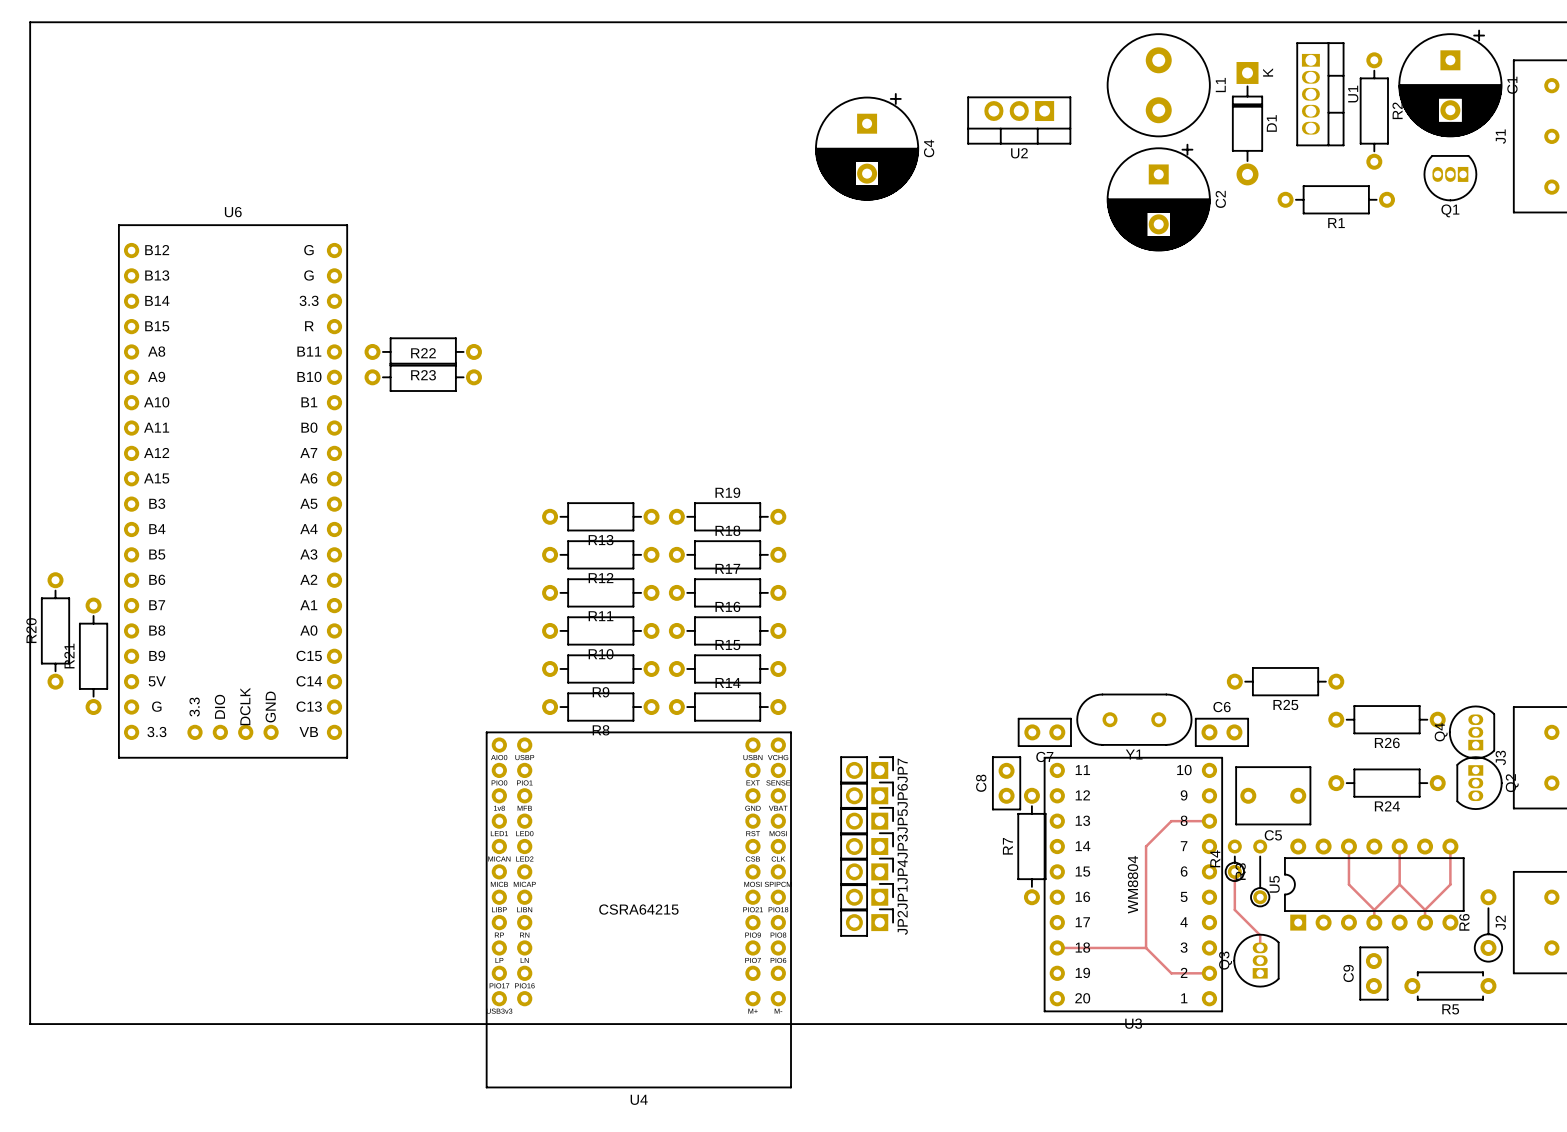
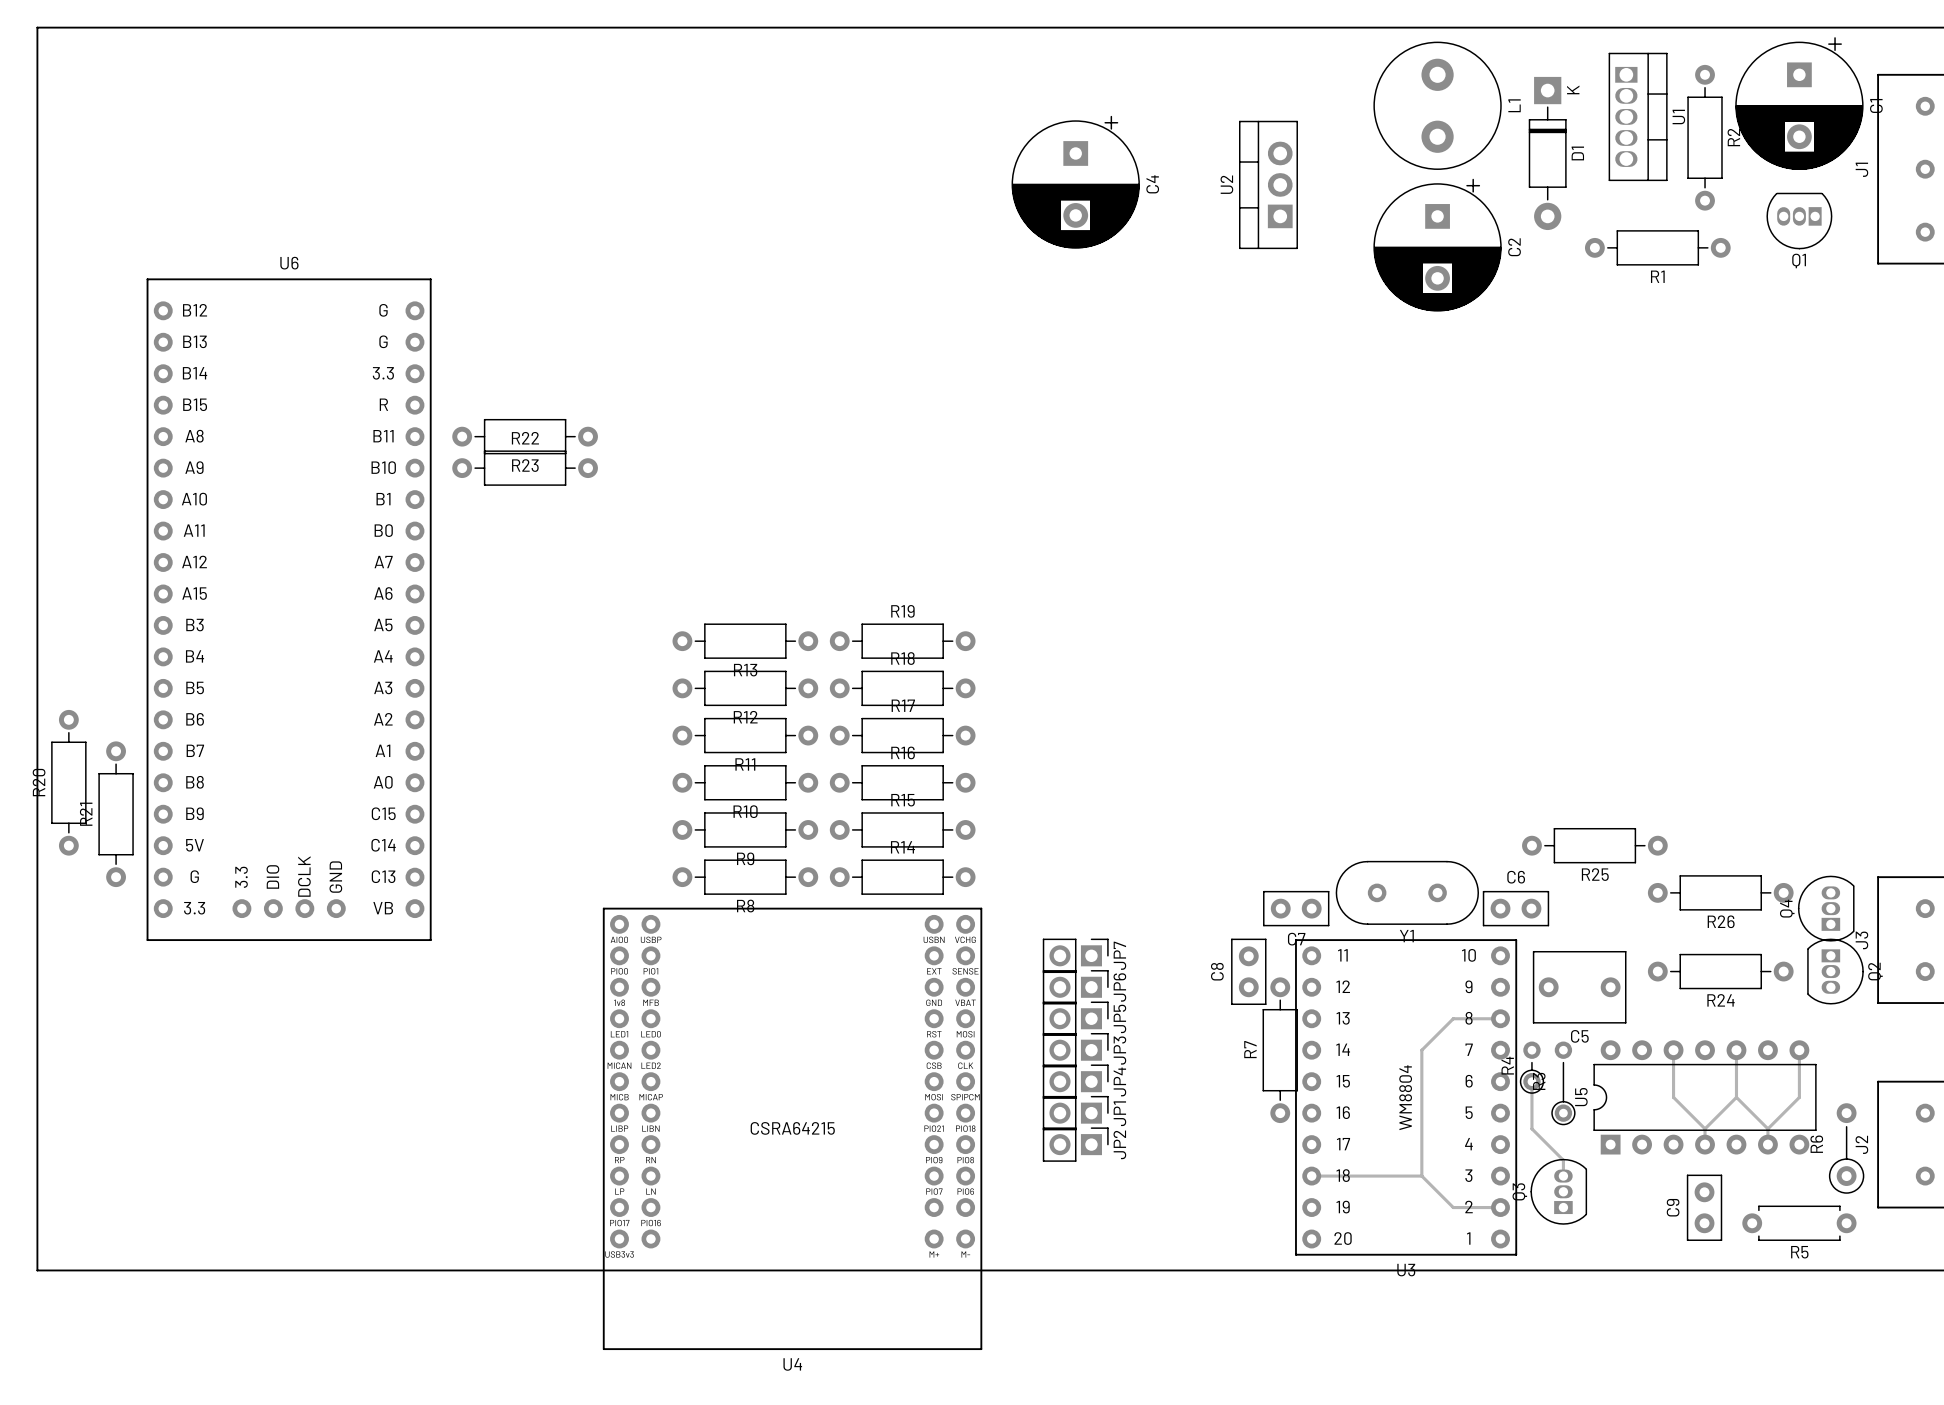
U2 rotation: 0° (1019, 120) -> 90° clockwise (1268, 184)

